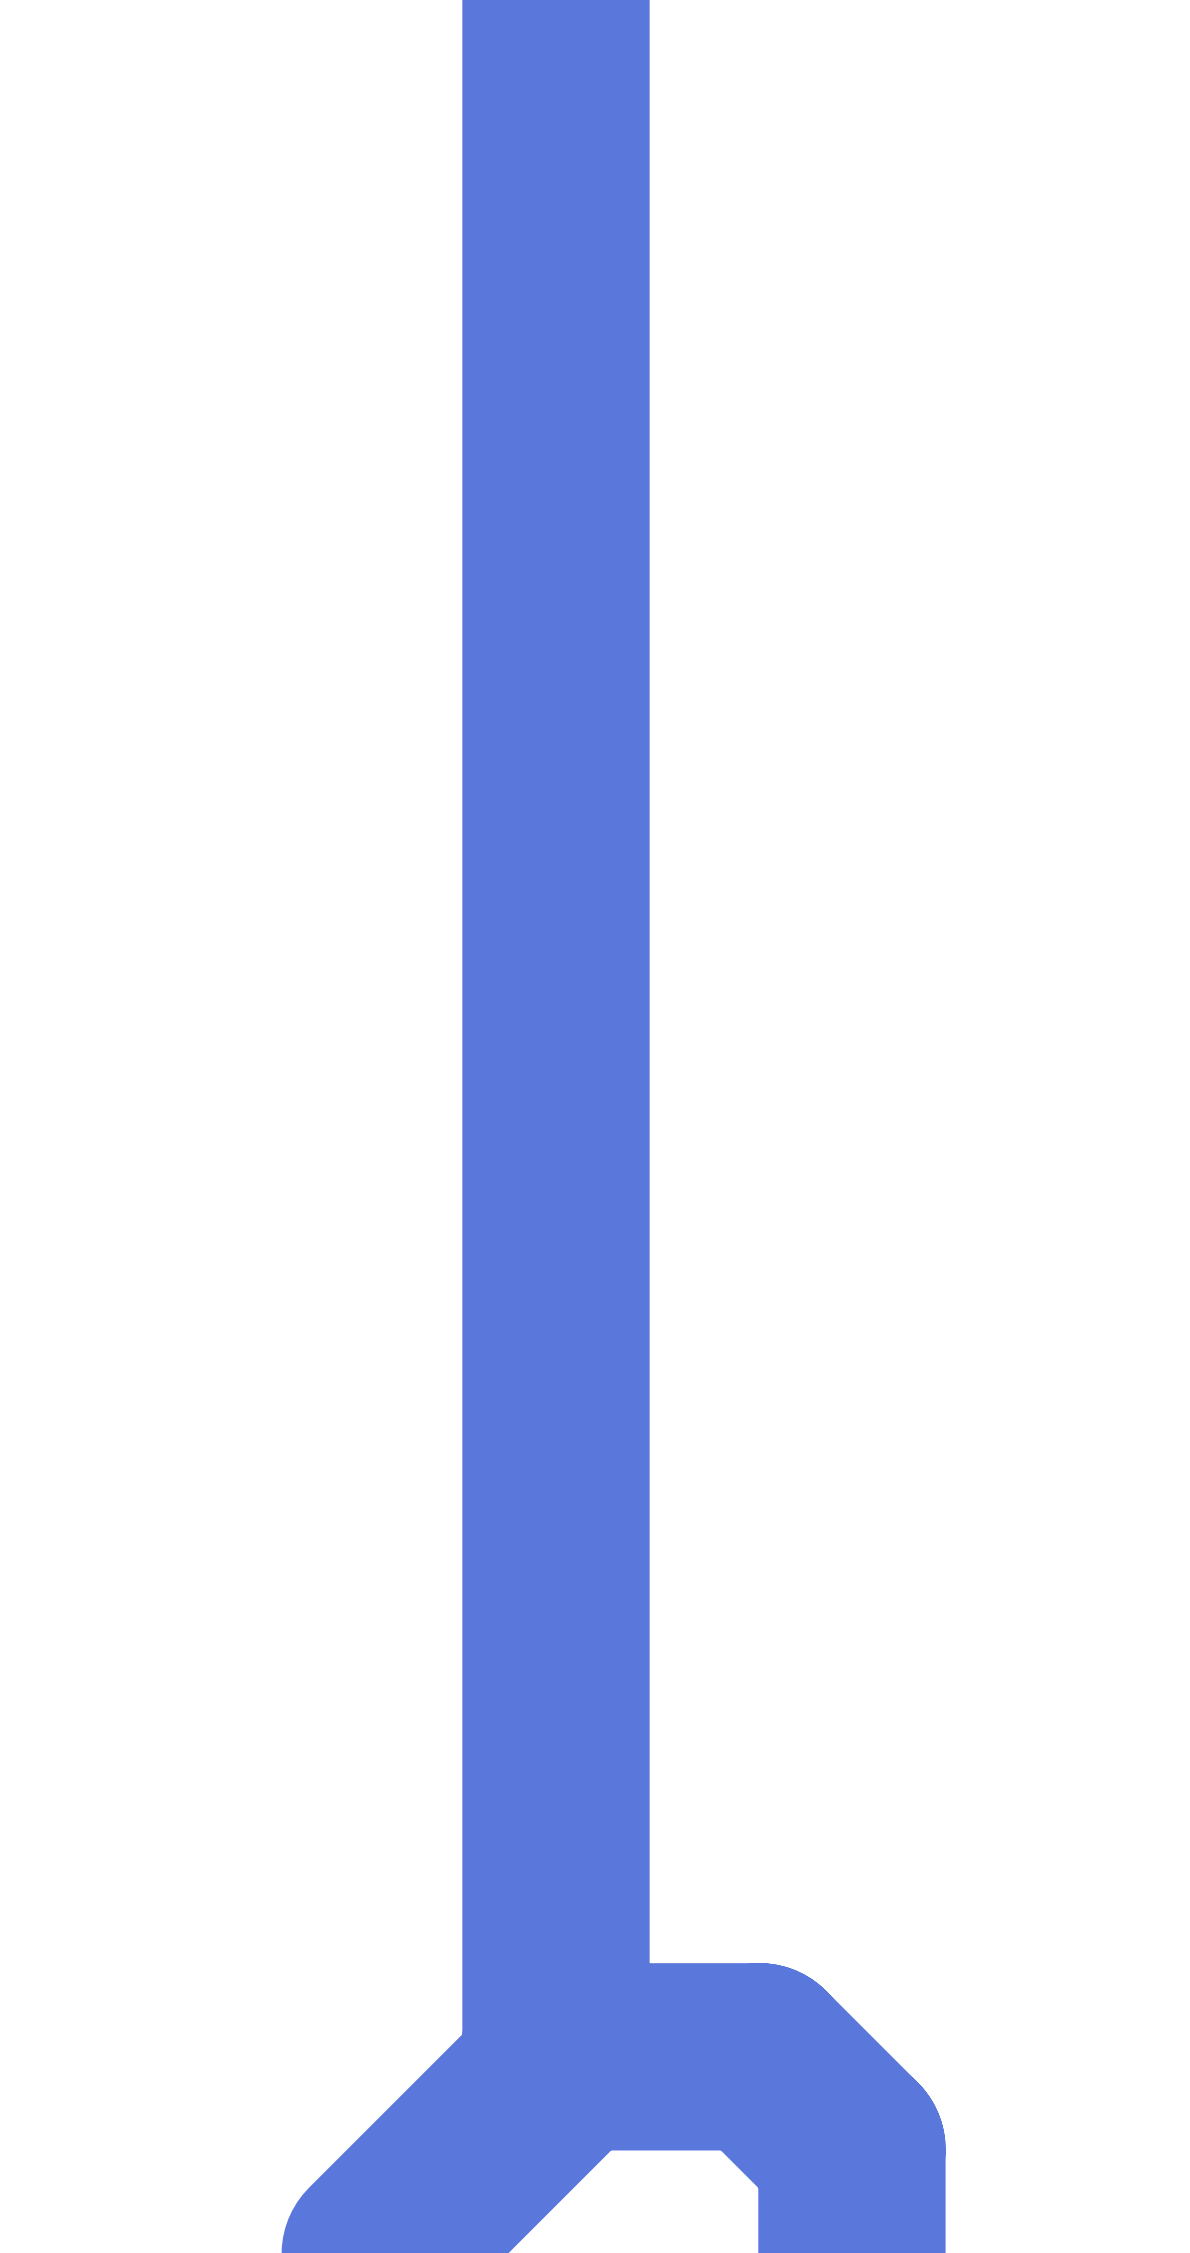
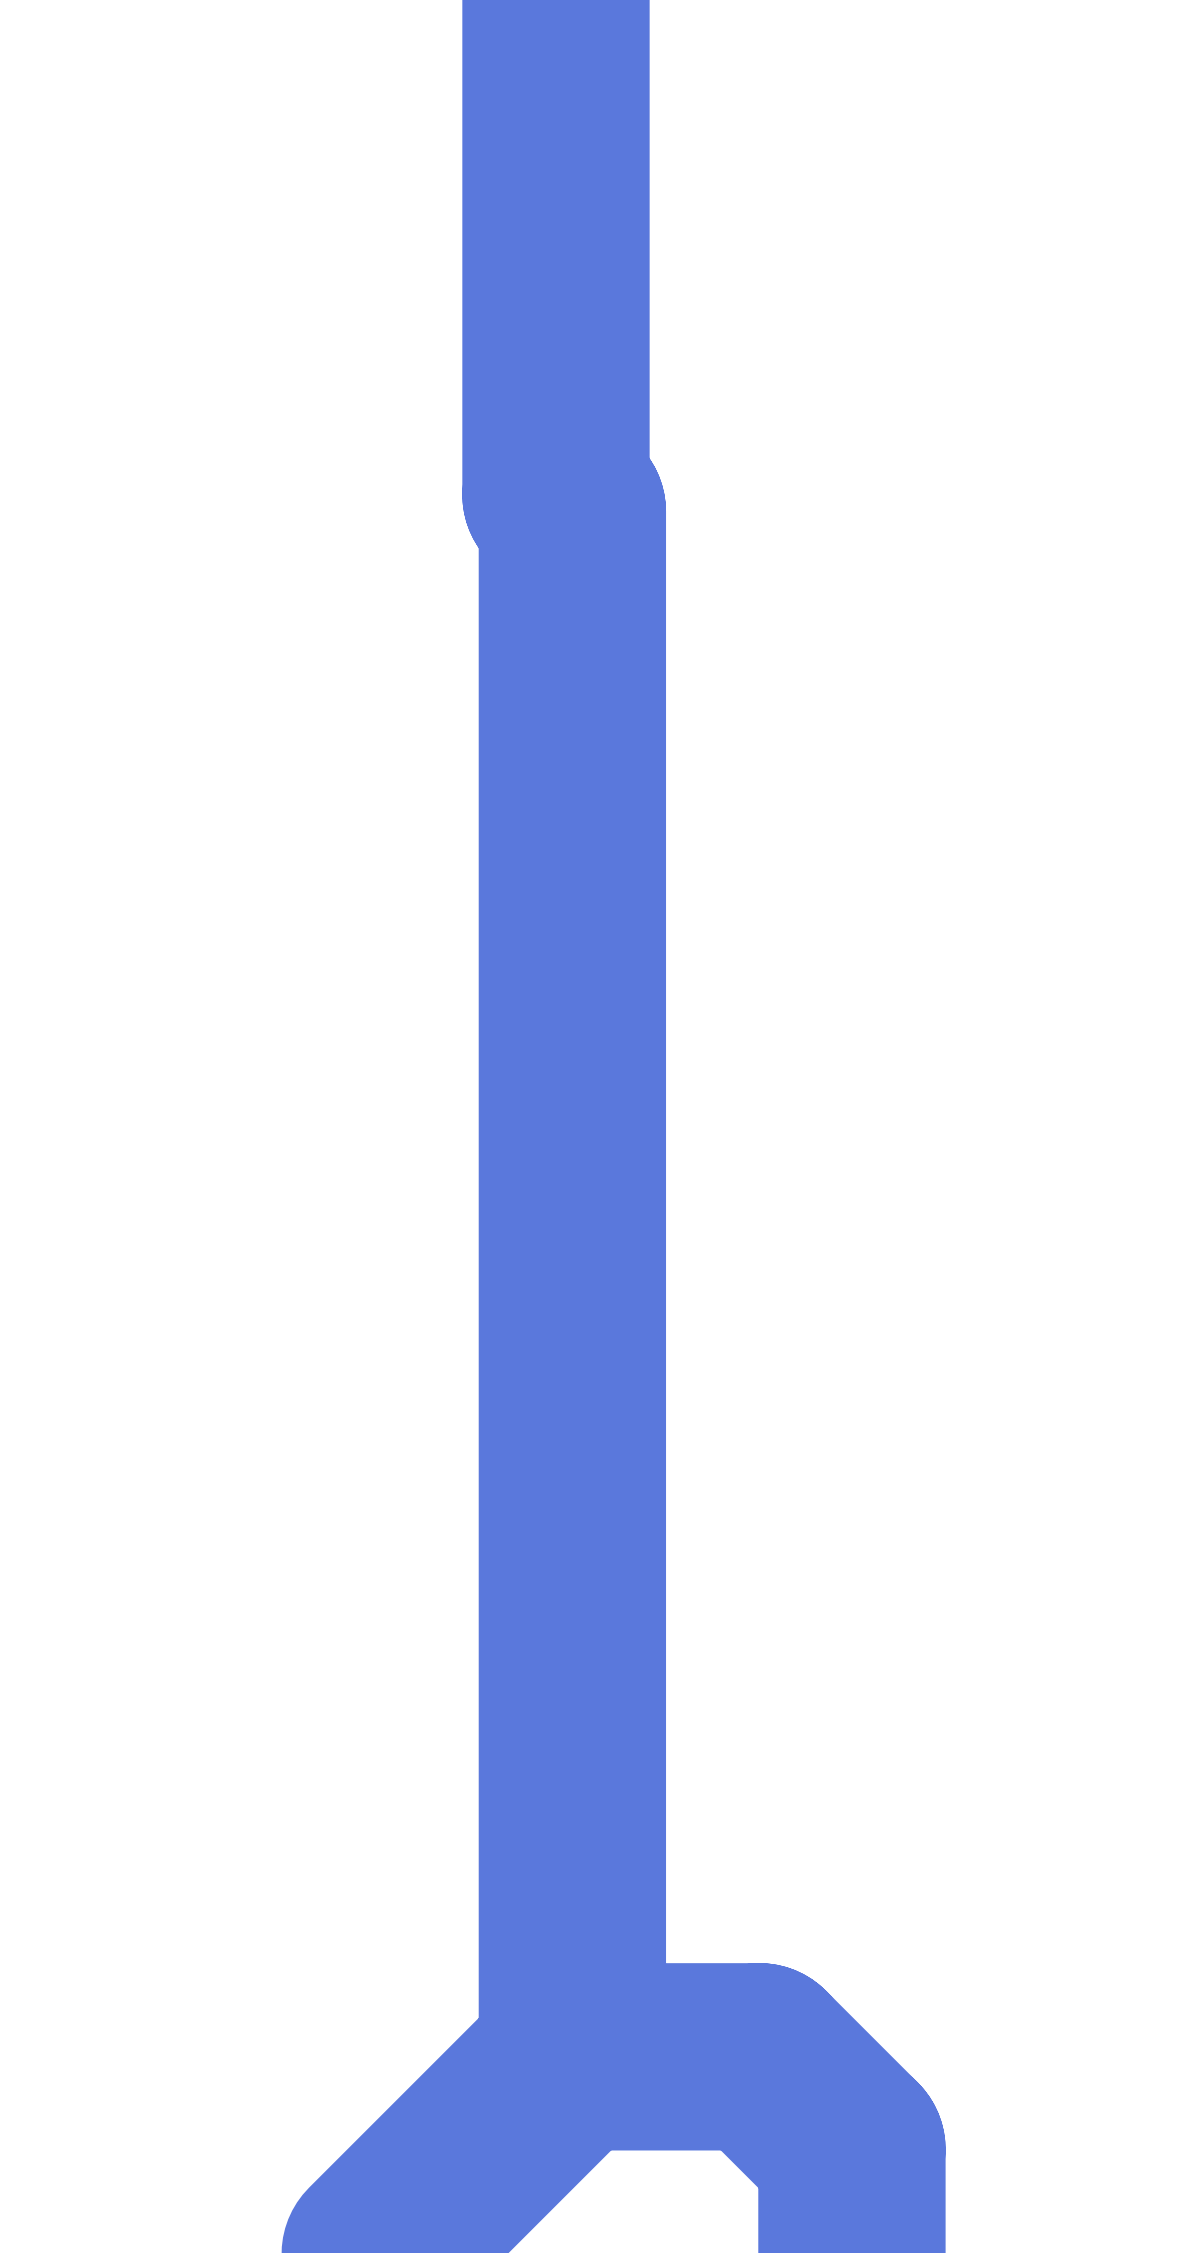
track: (555, 495) (555, 2040) (572, 2056) -> (555, 495) (572, 511) (572, 2056)

